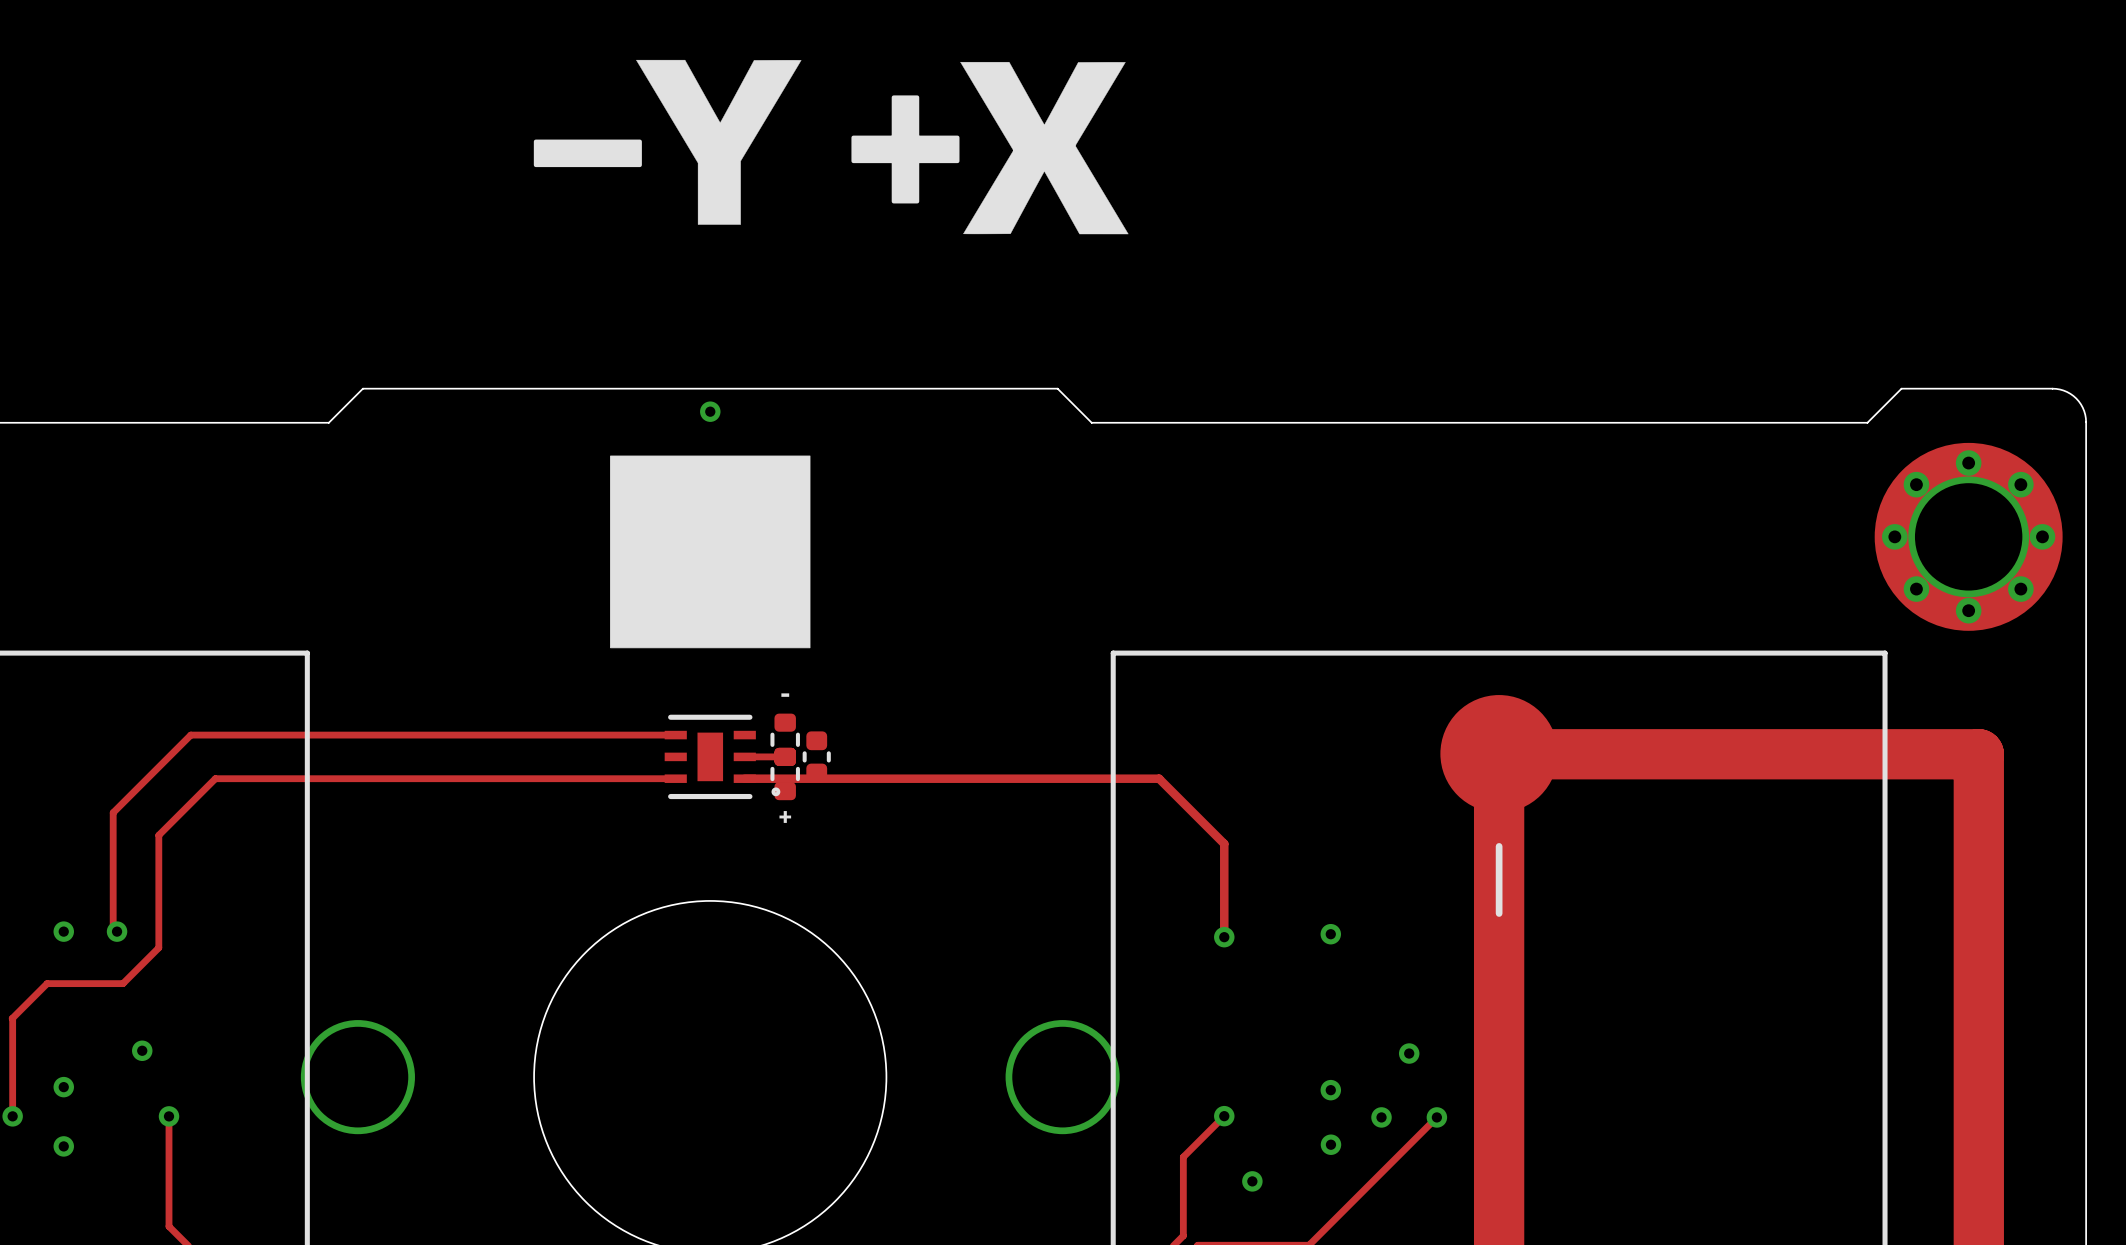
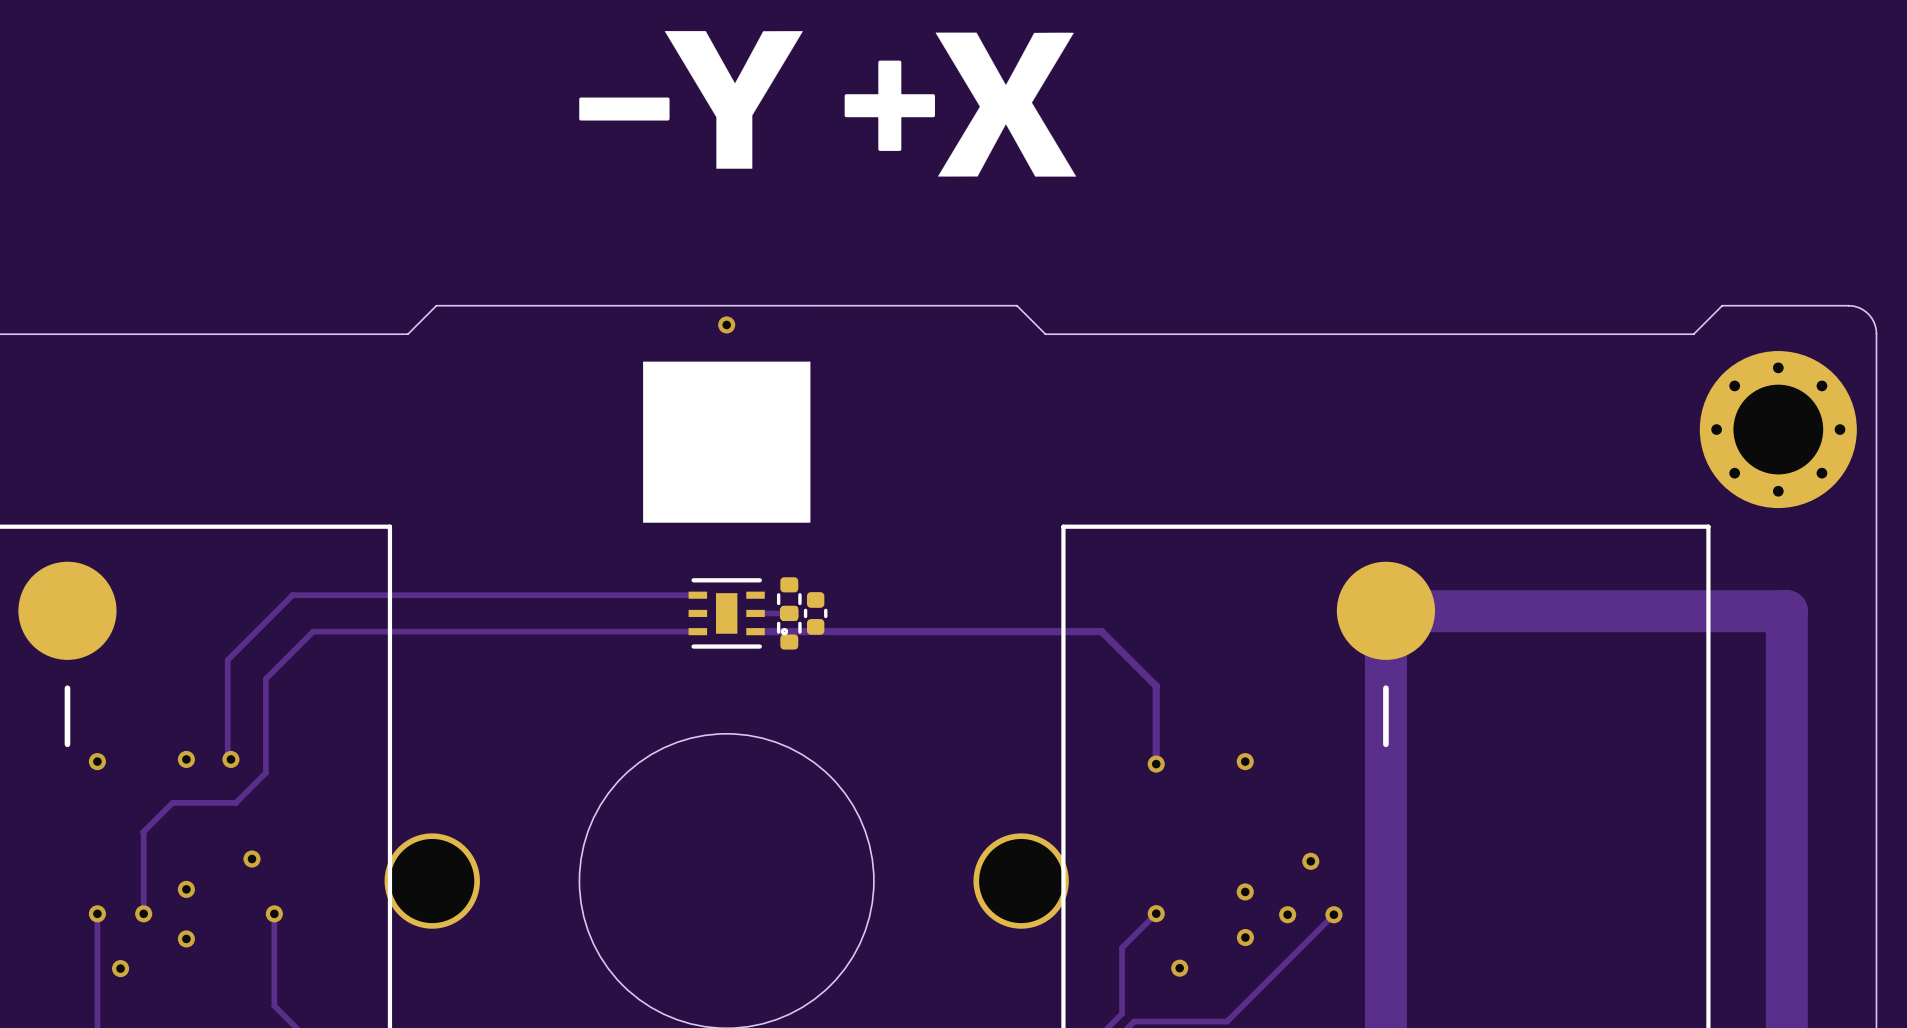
text: - (785, 695) -> none
part footprint: [664, 714, 781, 800] -> [688, 578, 789, 649]
text: + (785, 816) -> none

